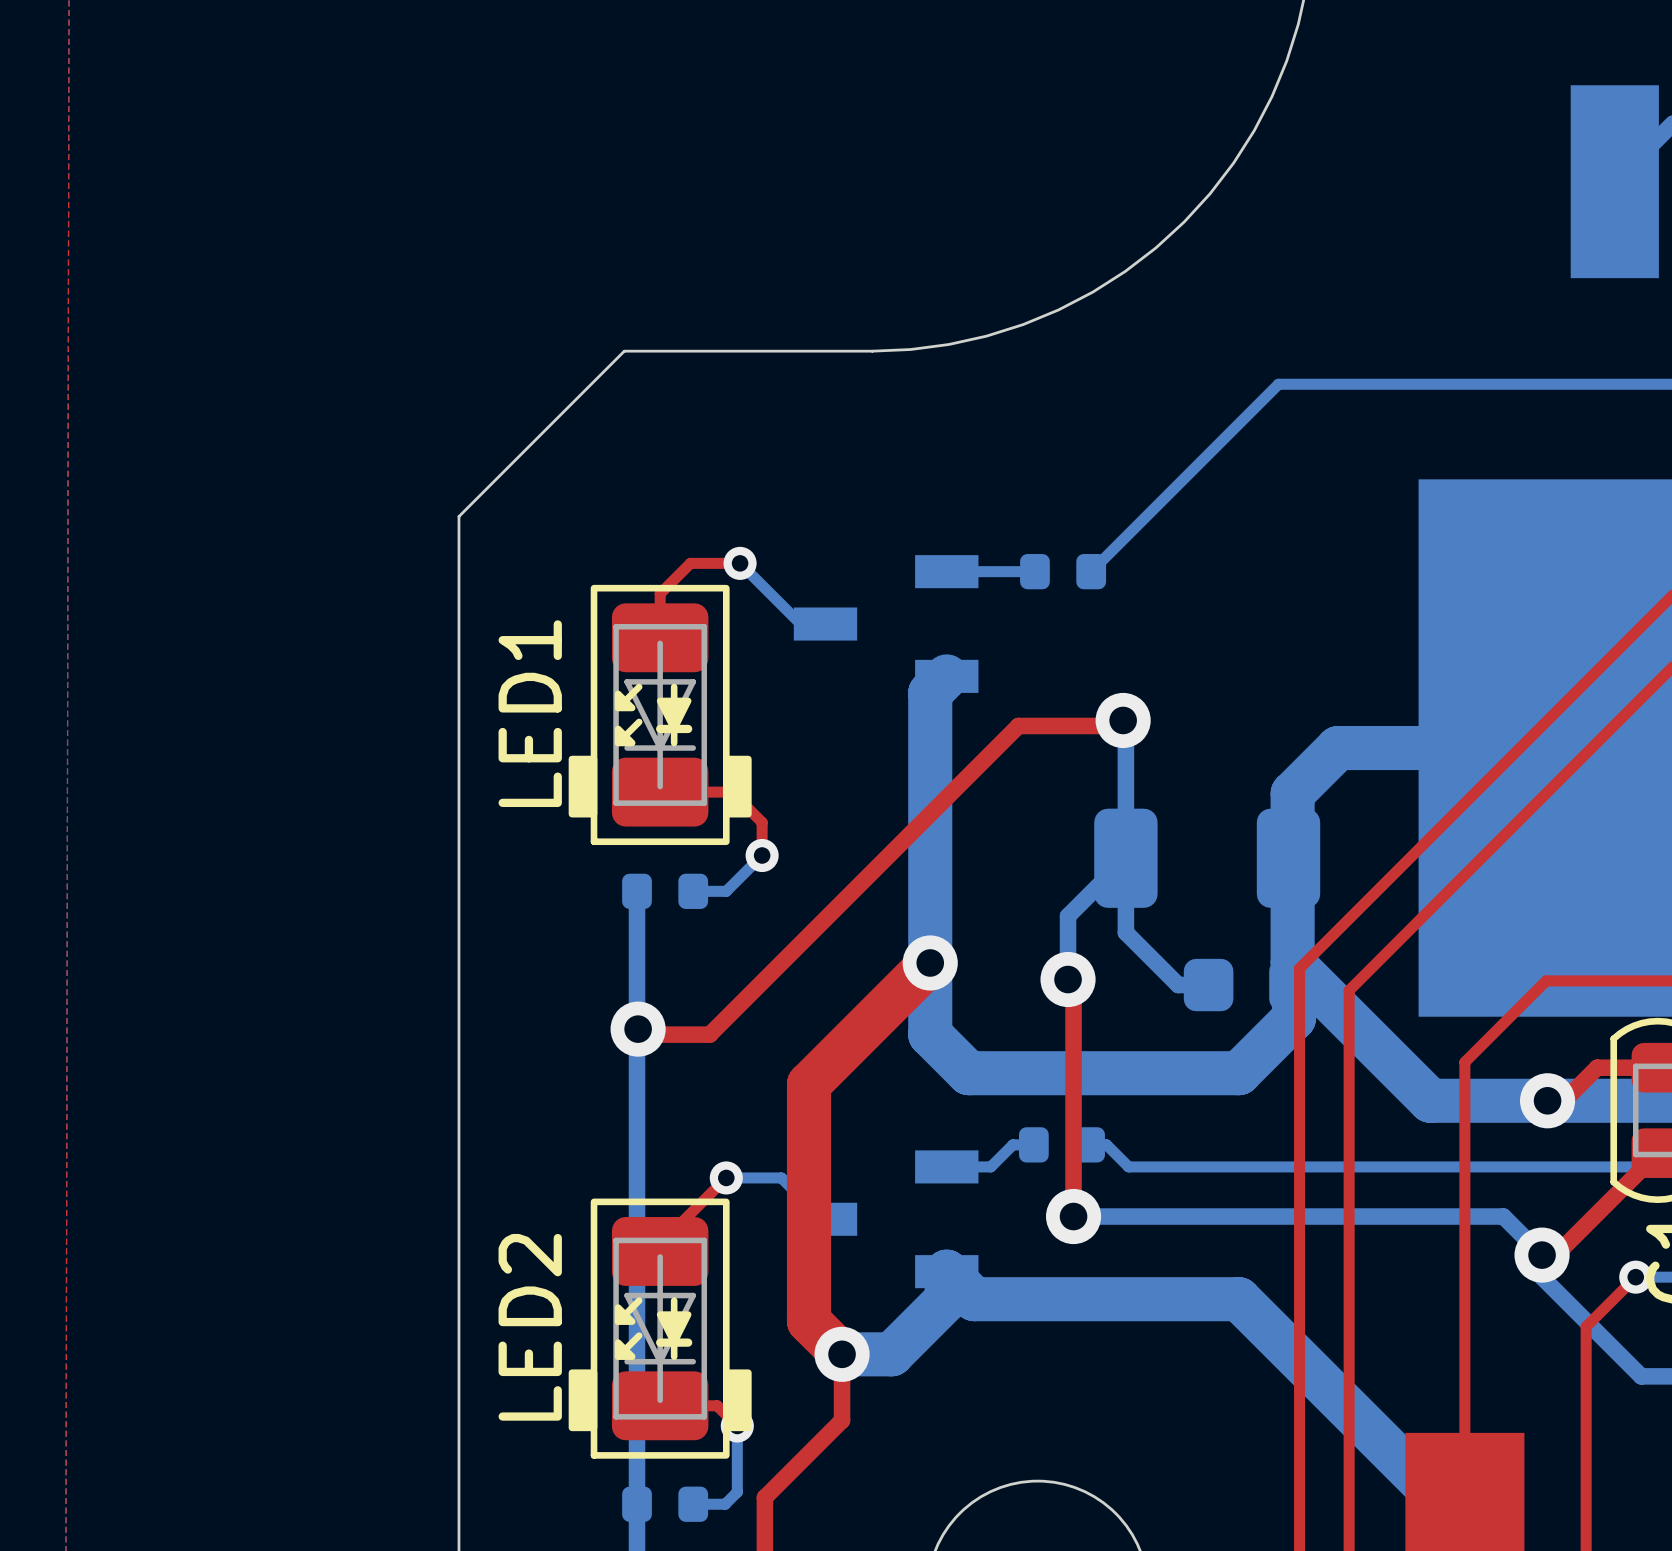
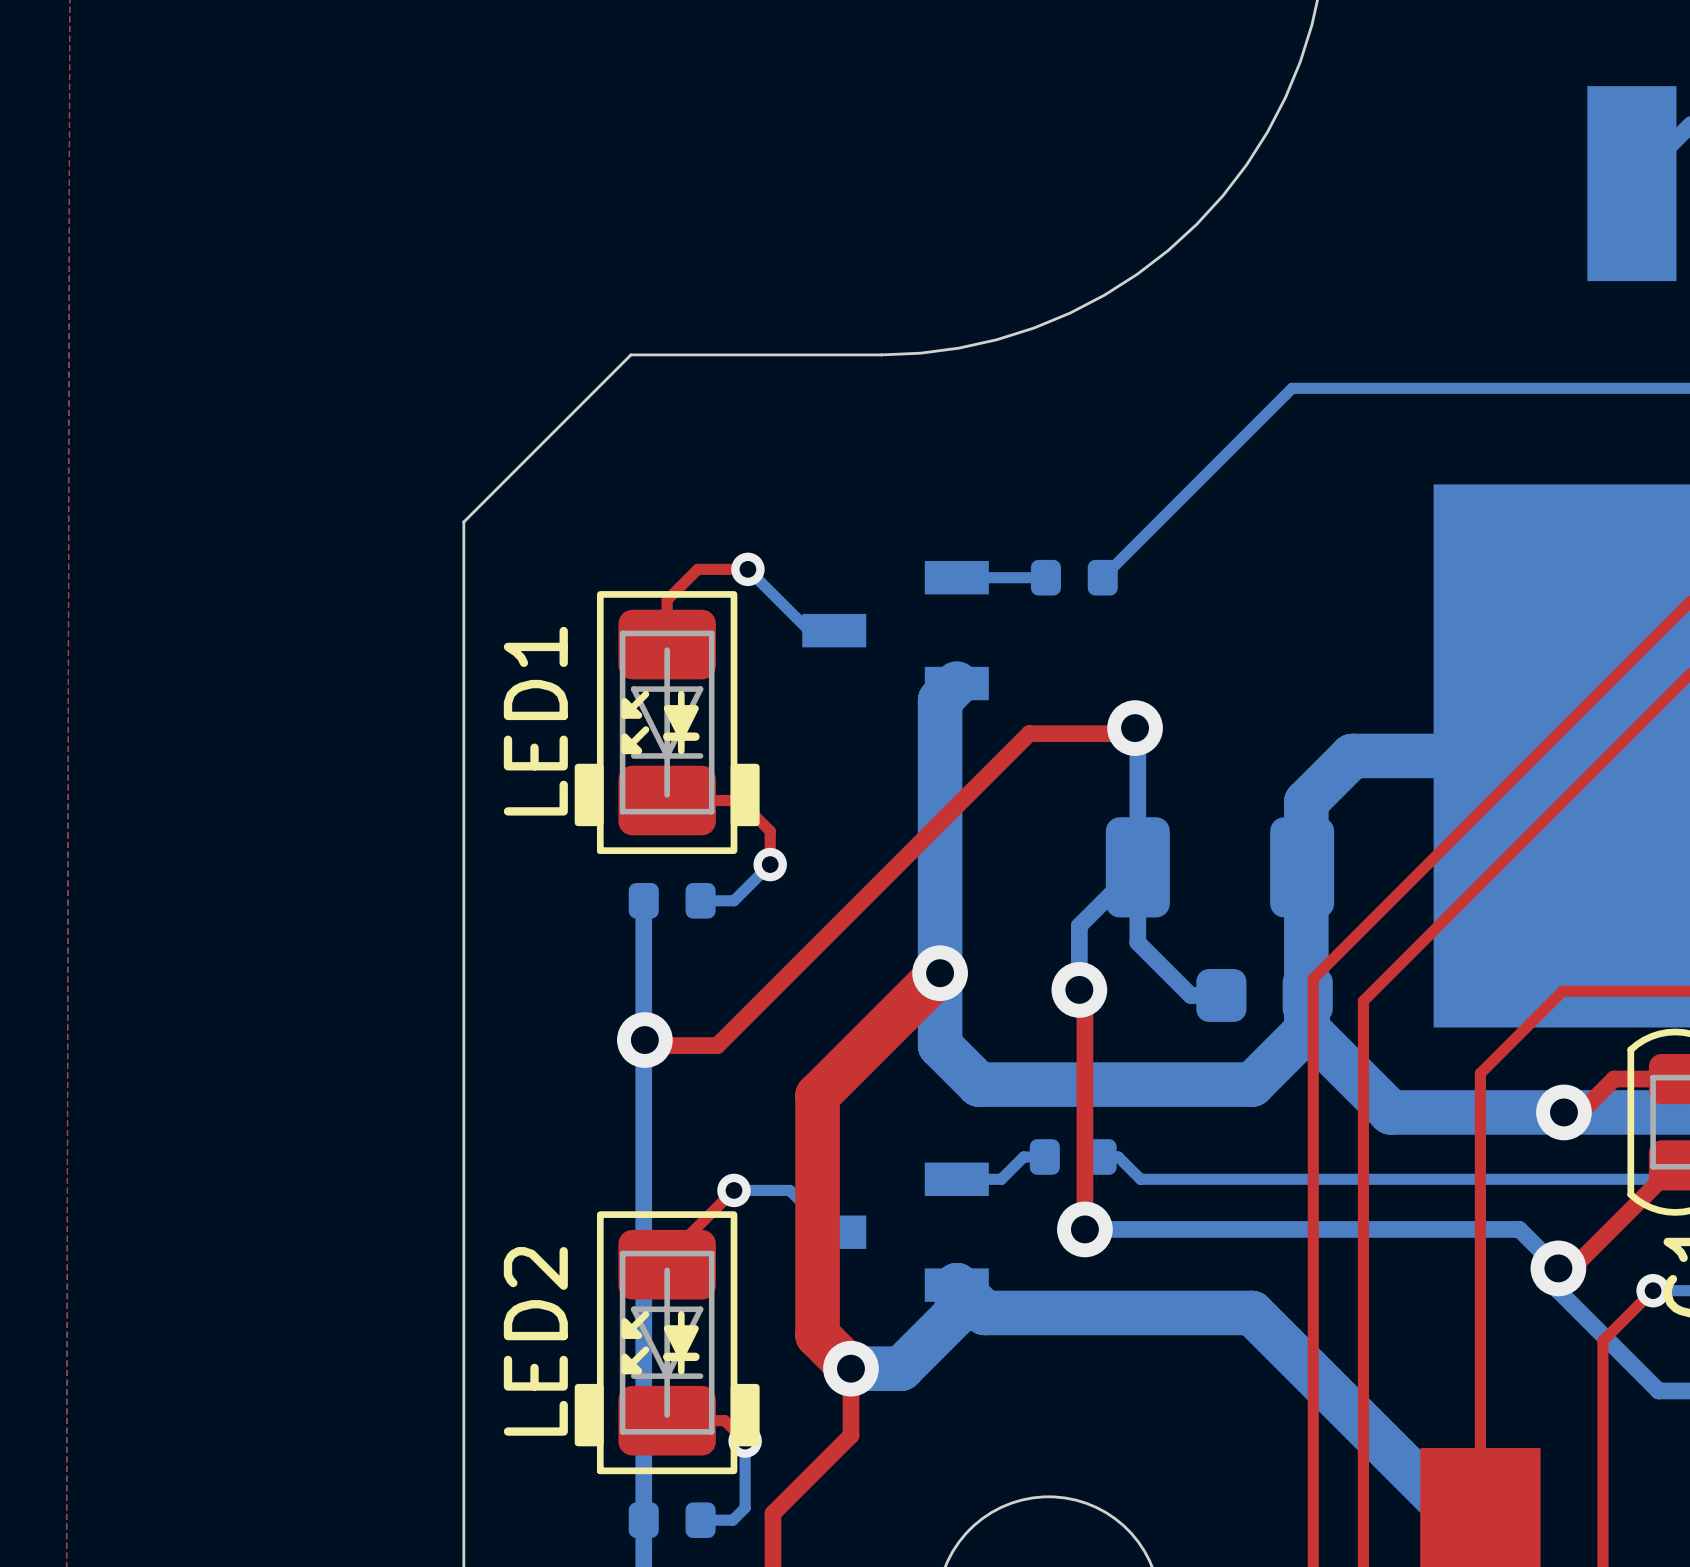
bottom track: (1292, 962) (1430, 1100) -> (1306, 973) (1306, 1027) (1390, 1112) (1445, 1112)

